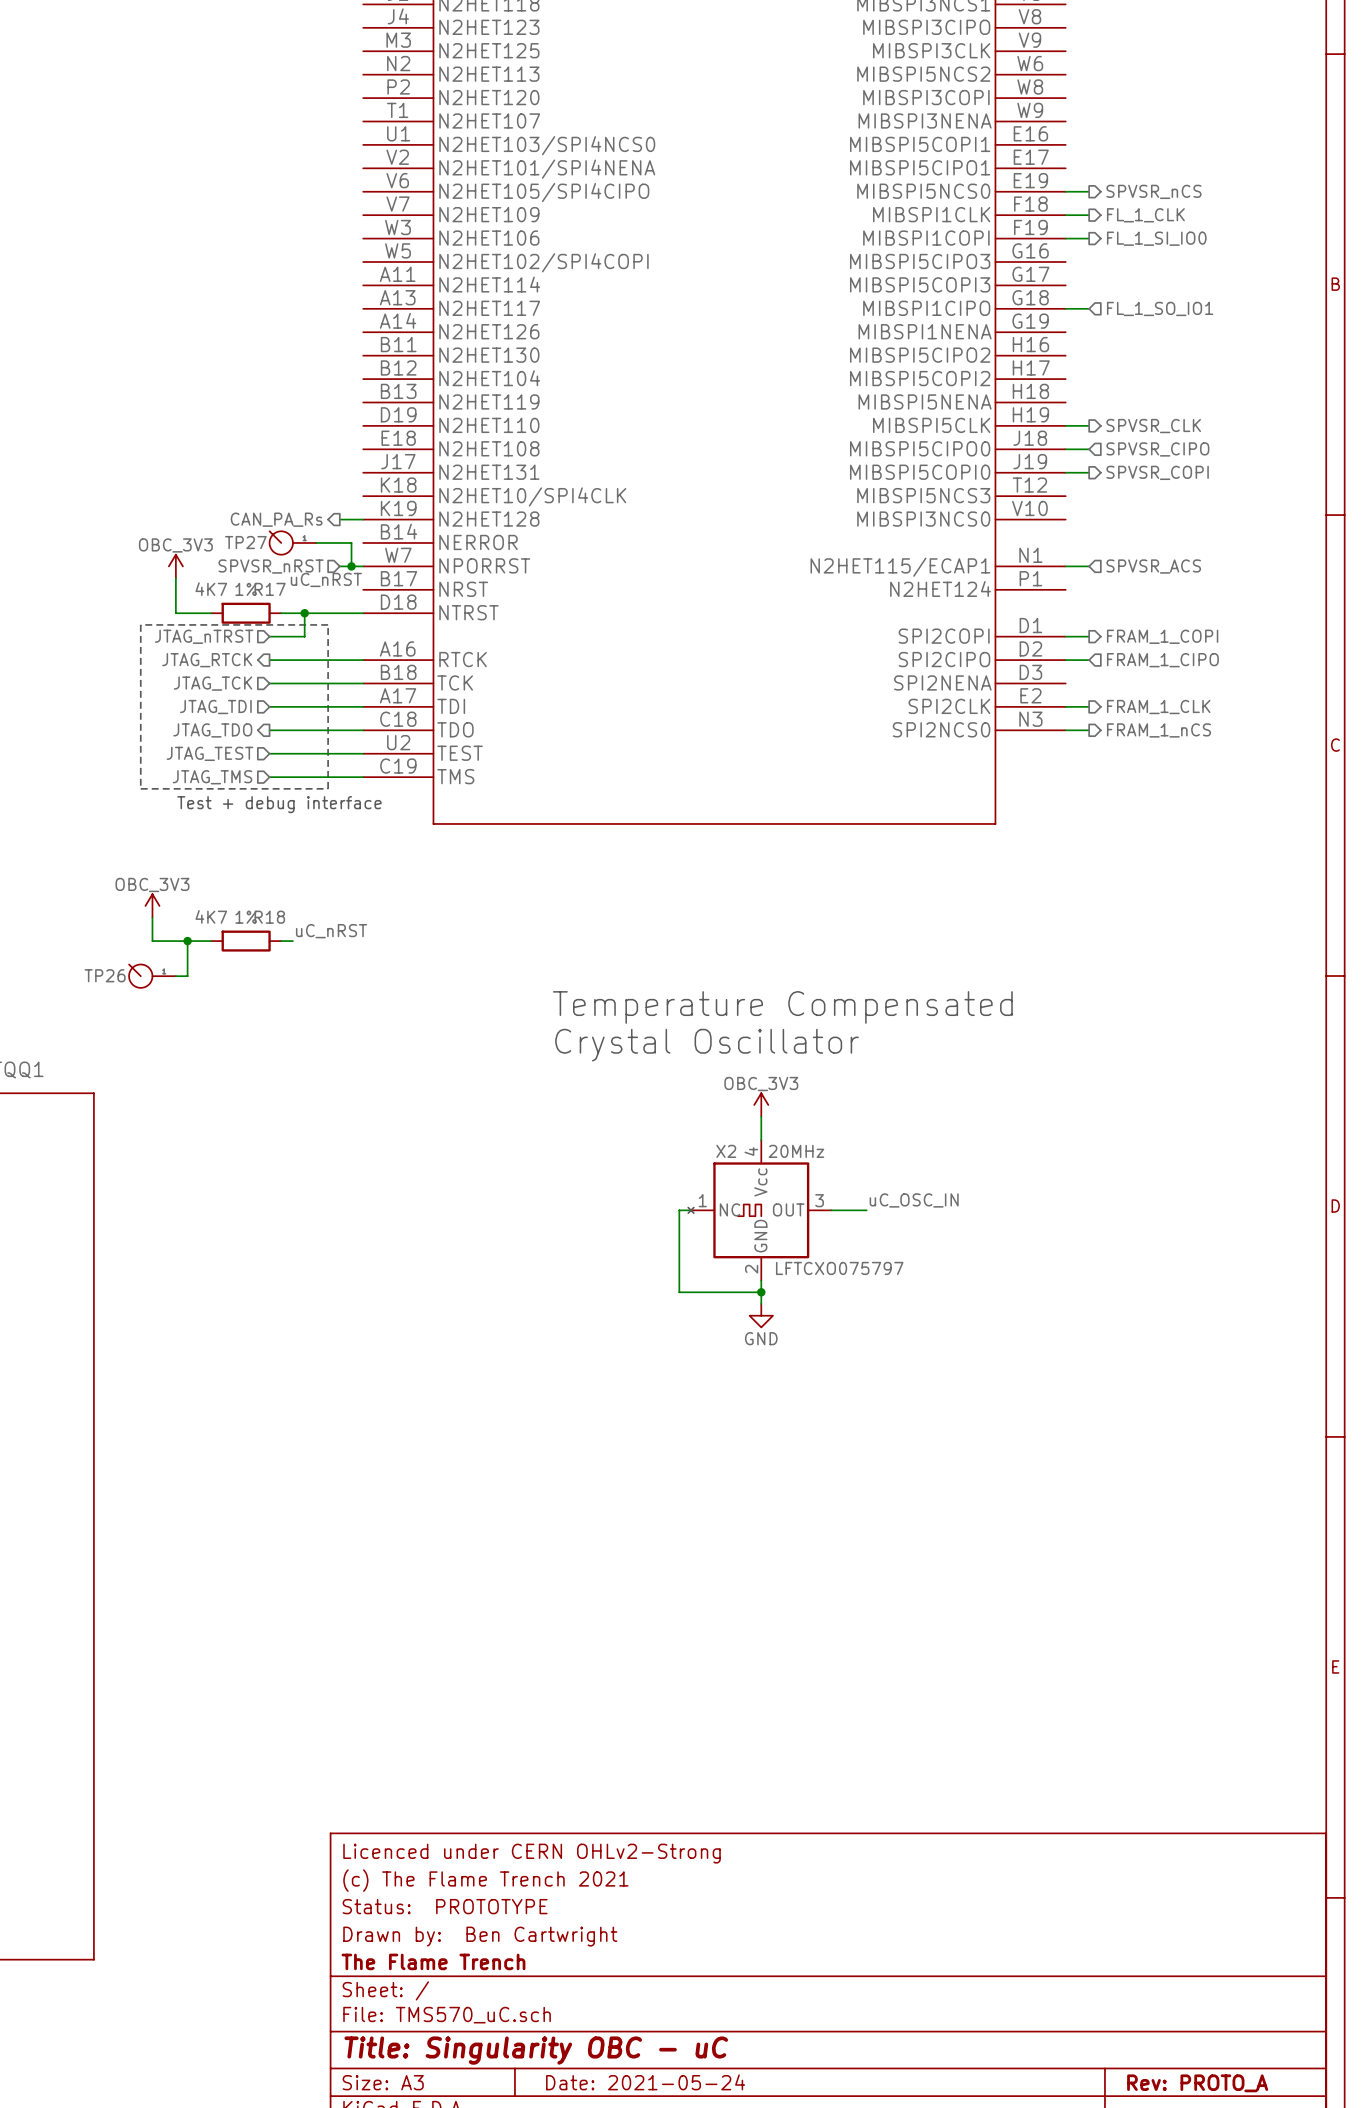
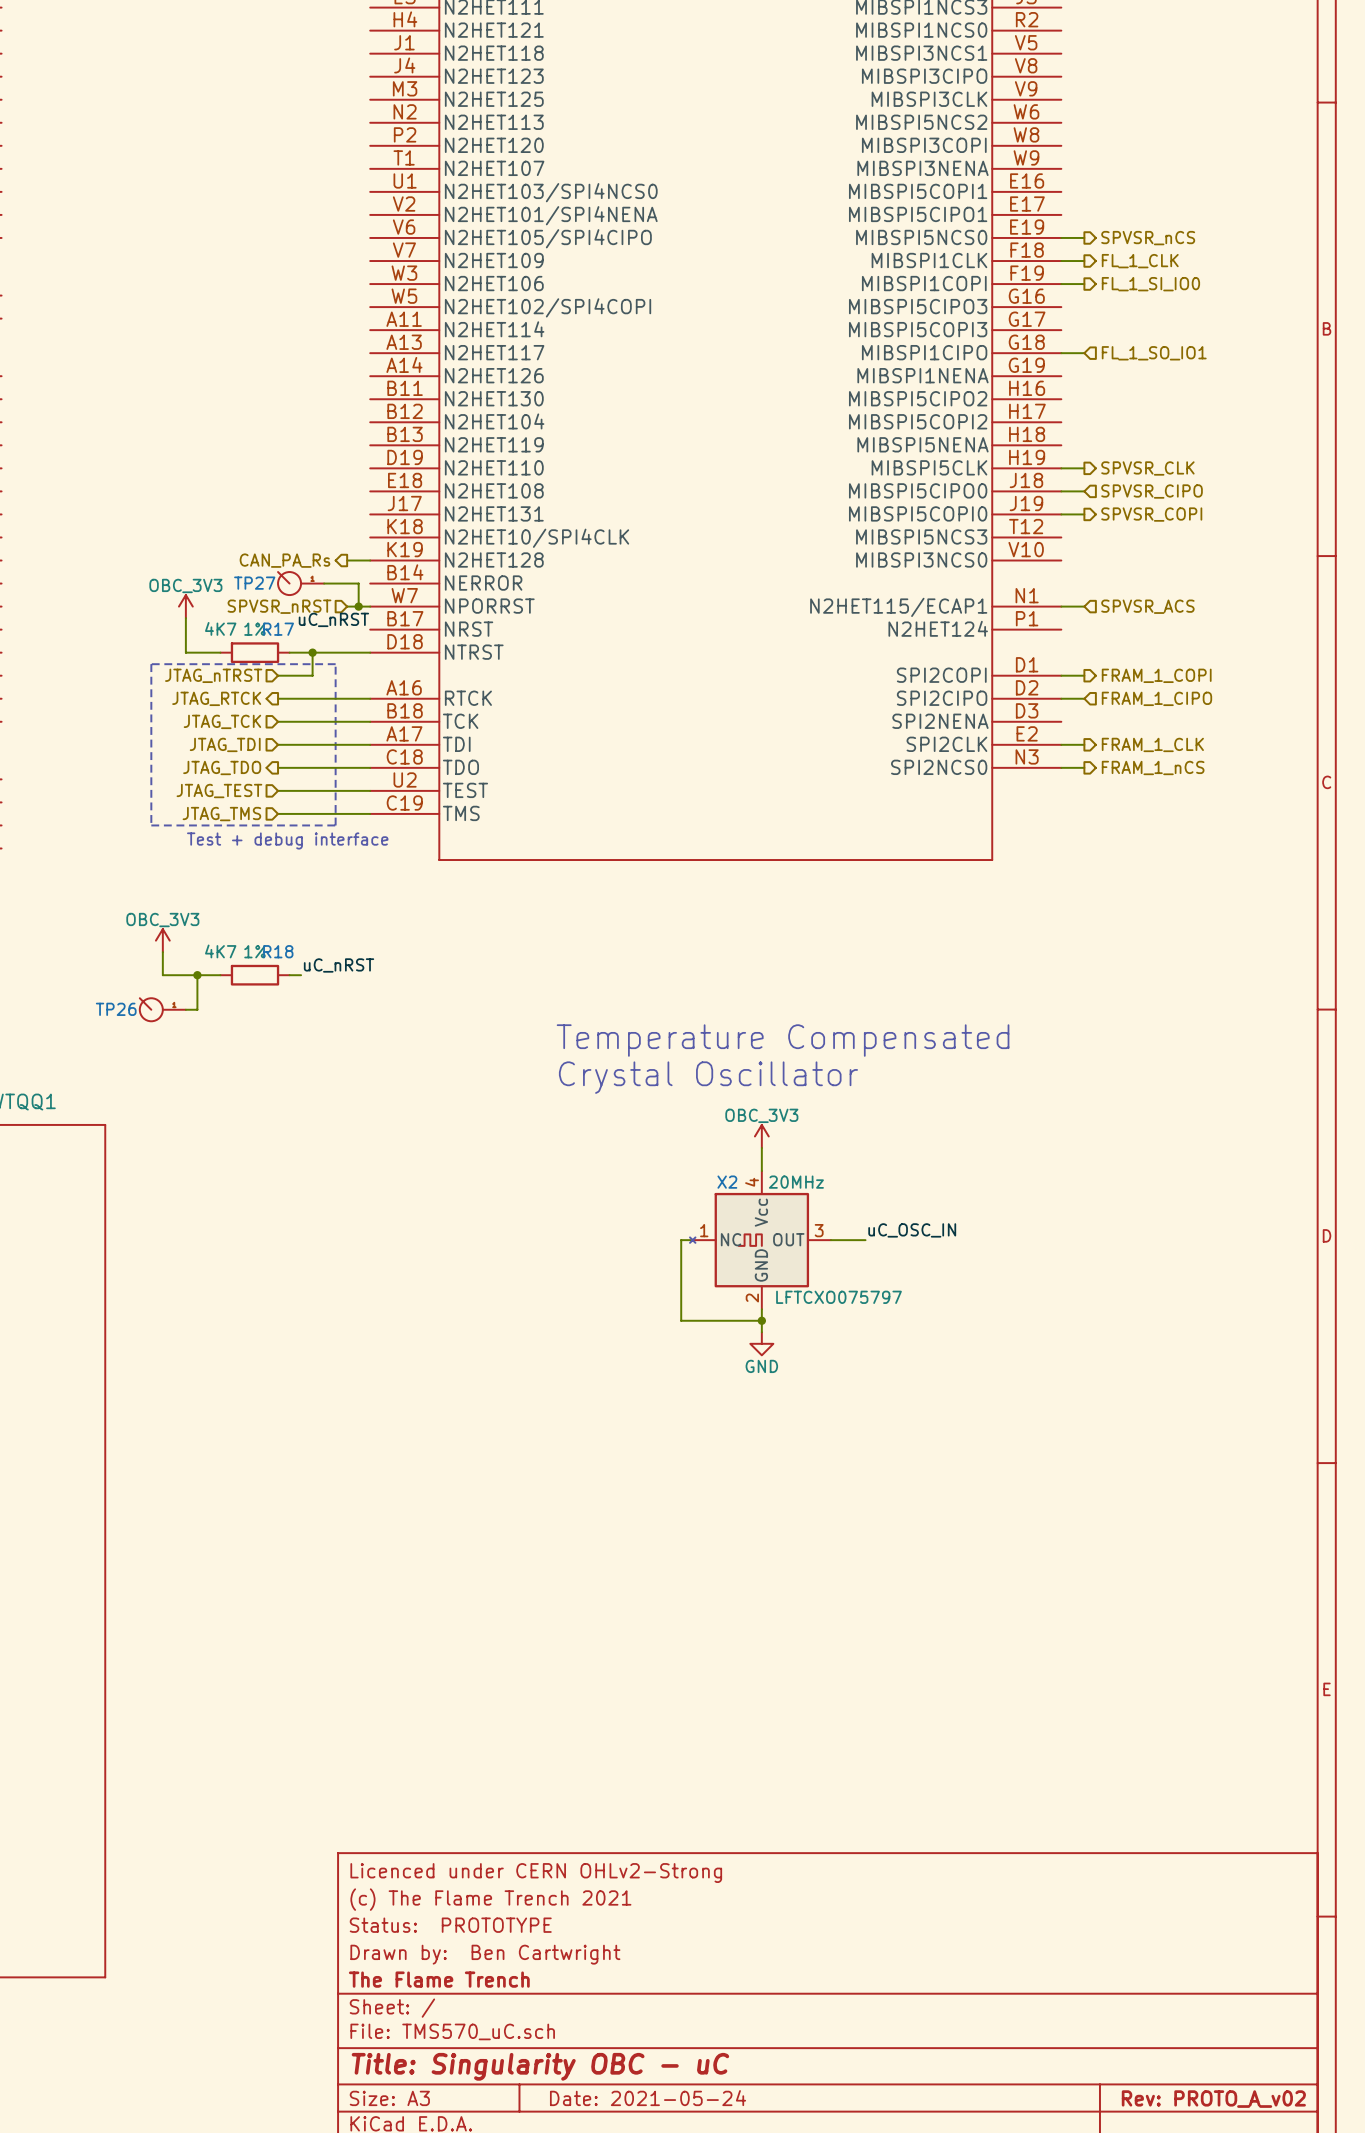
title block: Rev: PROTO_A (1197, 2083) -> Rev: PROTO_A_v02 (1213, 2099)

